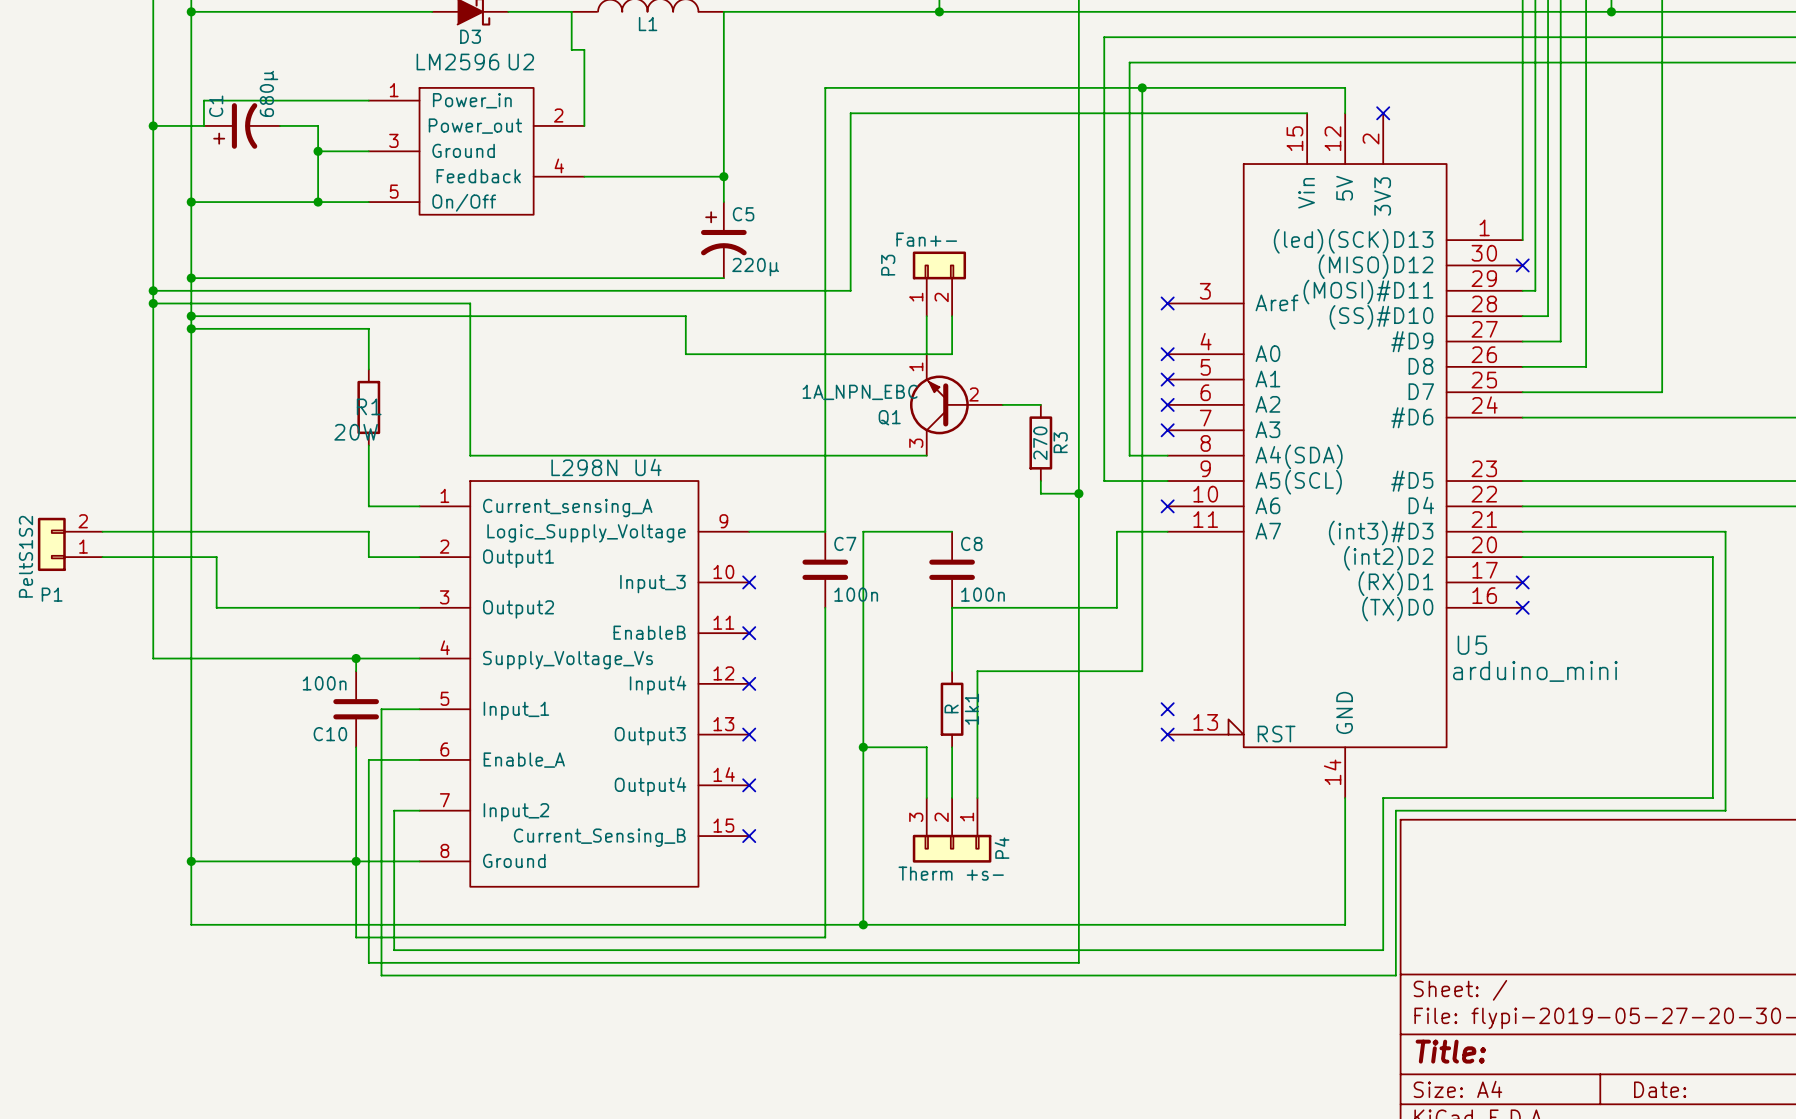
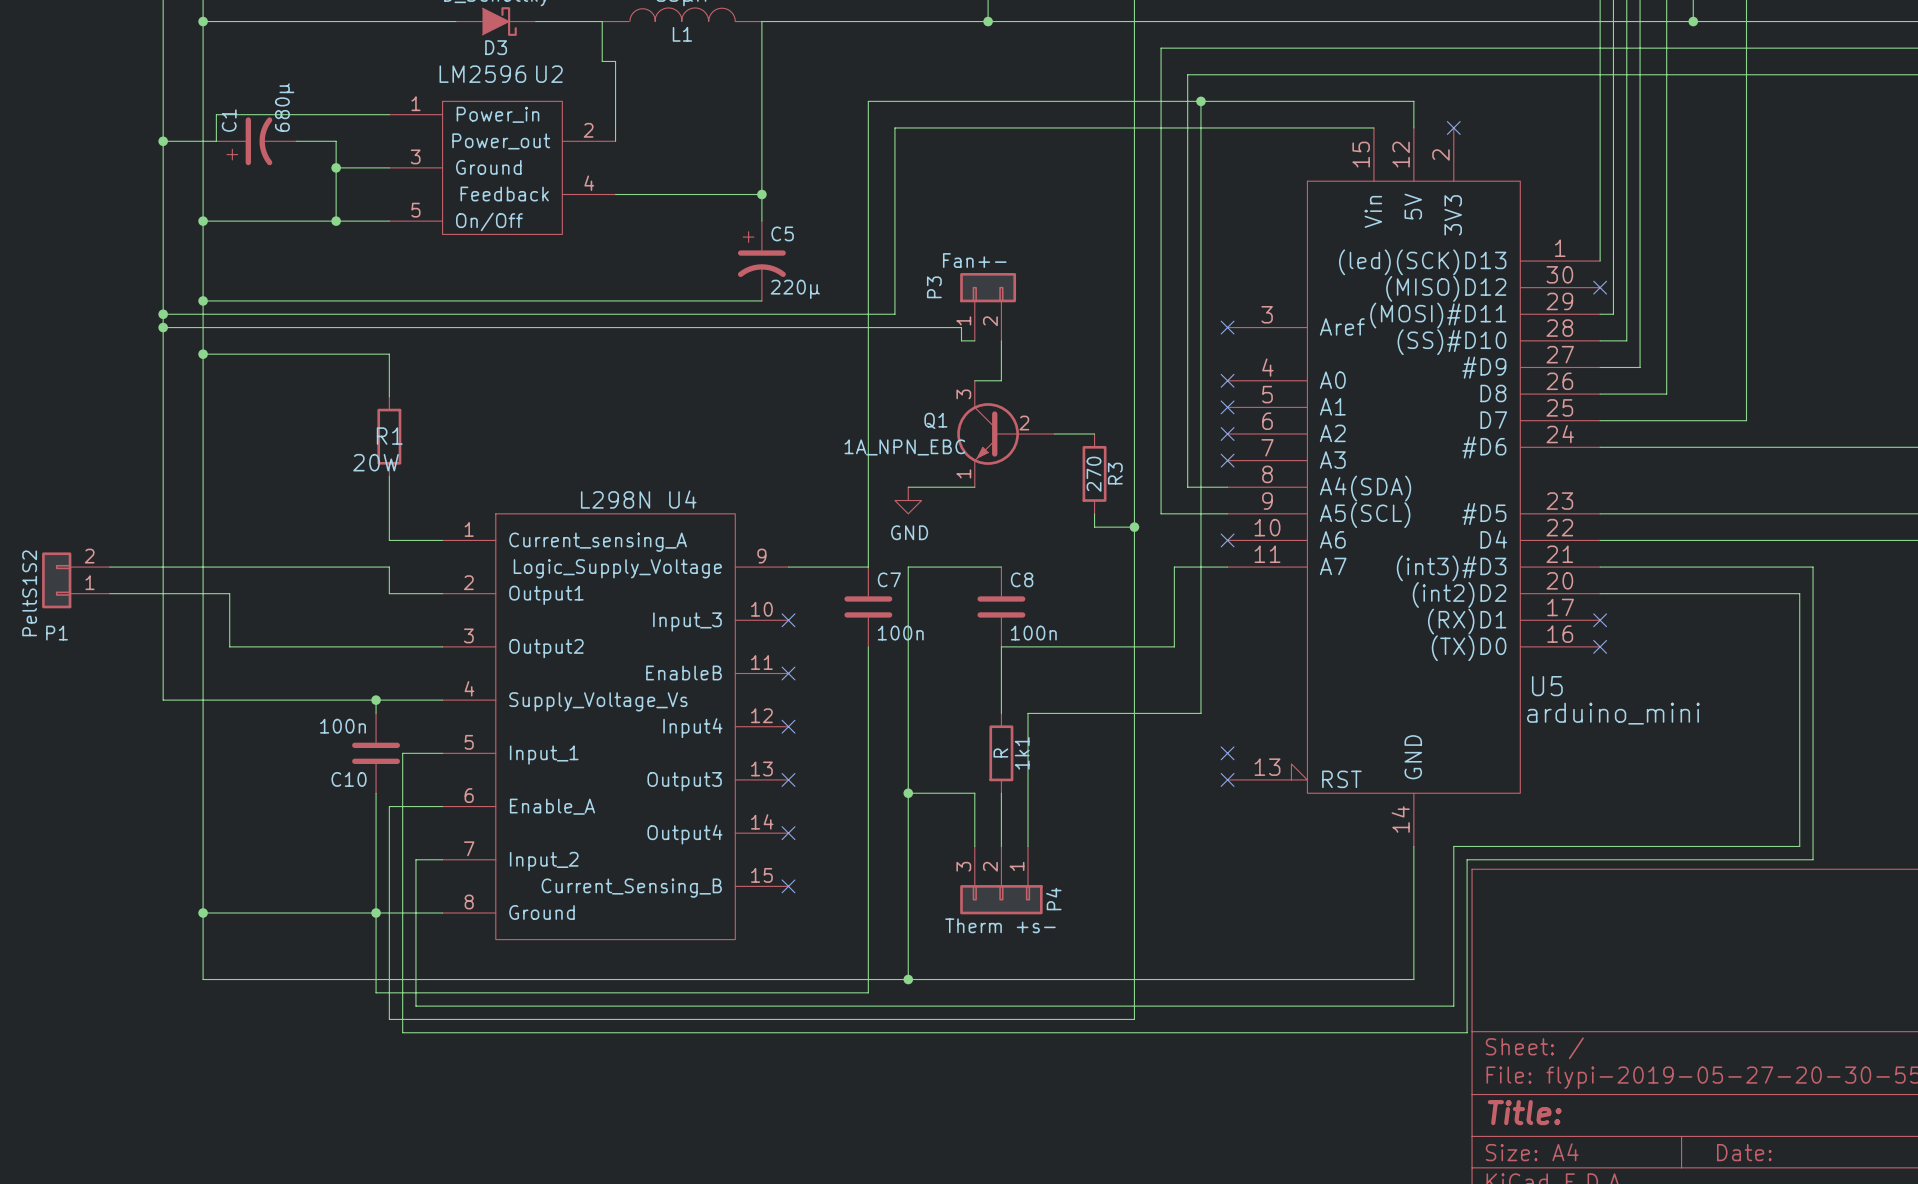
wire: (470, 303) (470, 455) (863, 455) -> (495, 327) (961, 327) (961, 340) (974, 340)
wire: (191, 316) (685, 316) (685, 354) (926, 354) (926, 316) -> none
junction: (191, 316) -> none
Q1 flip: as is (939, 404) -> up-down (988, 434)
power symbol: none -> GND (908, 500)

